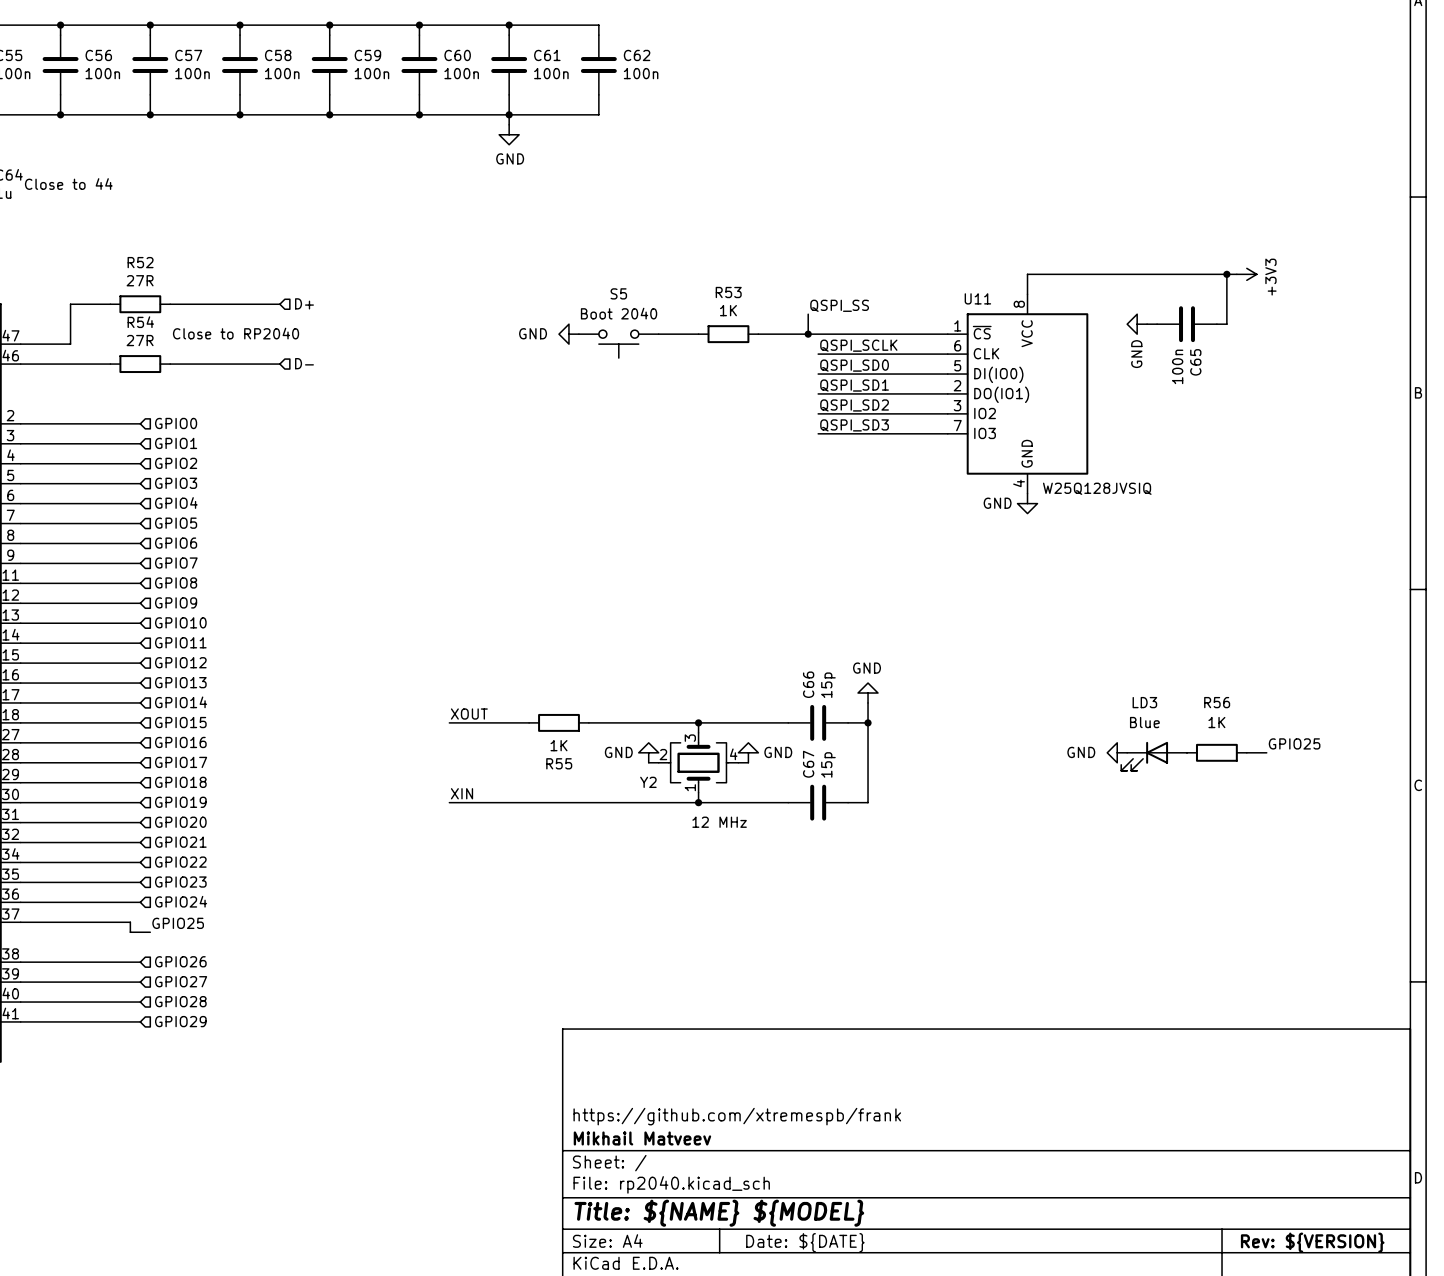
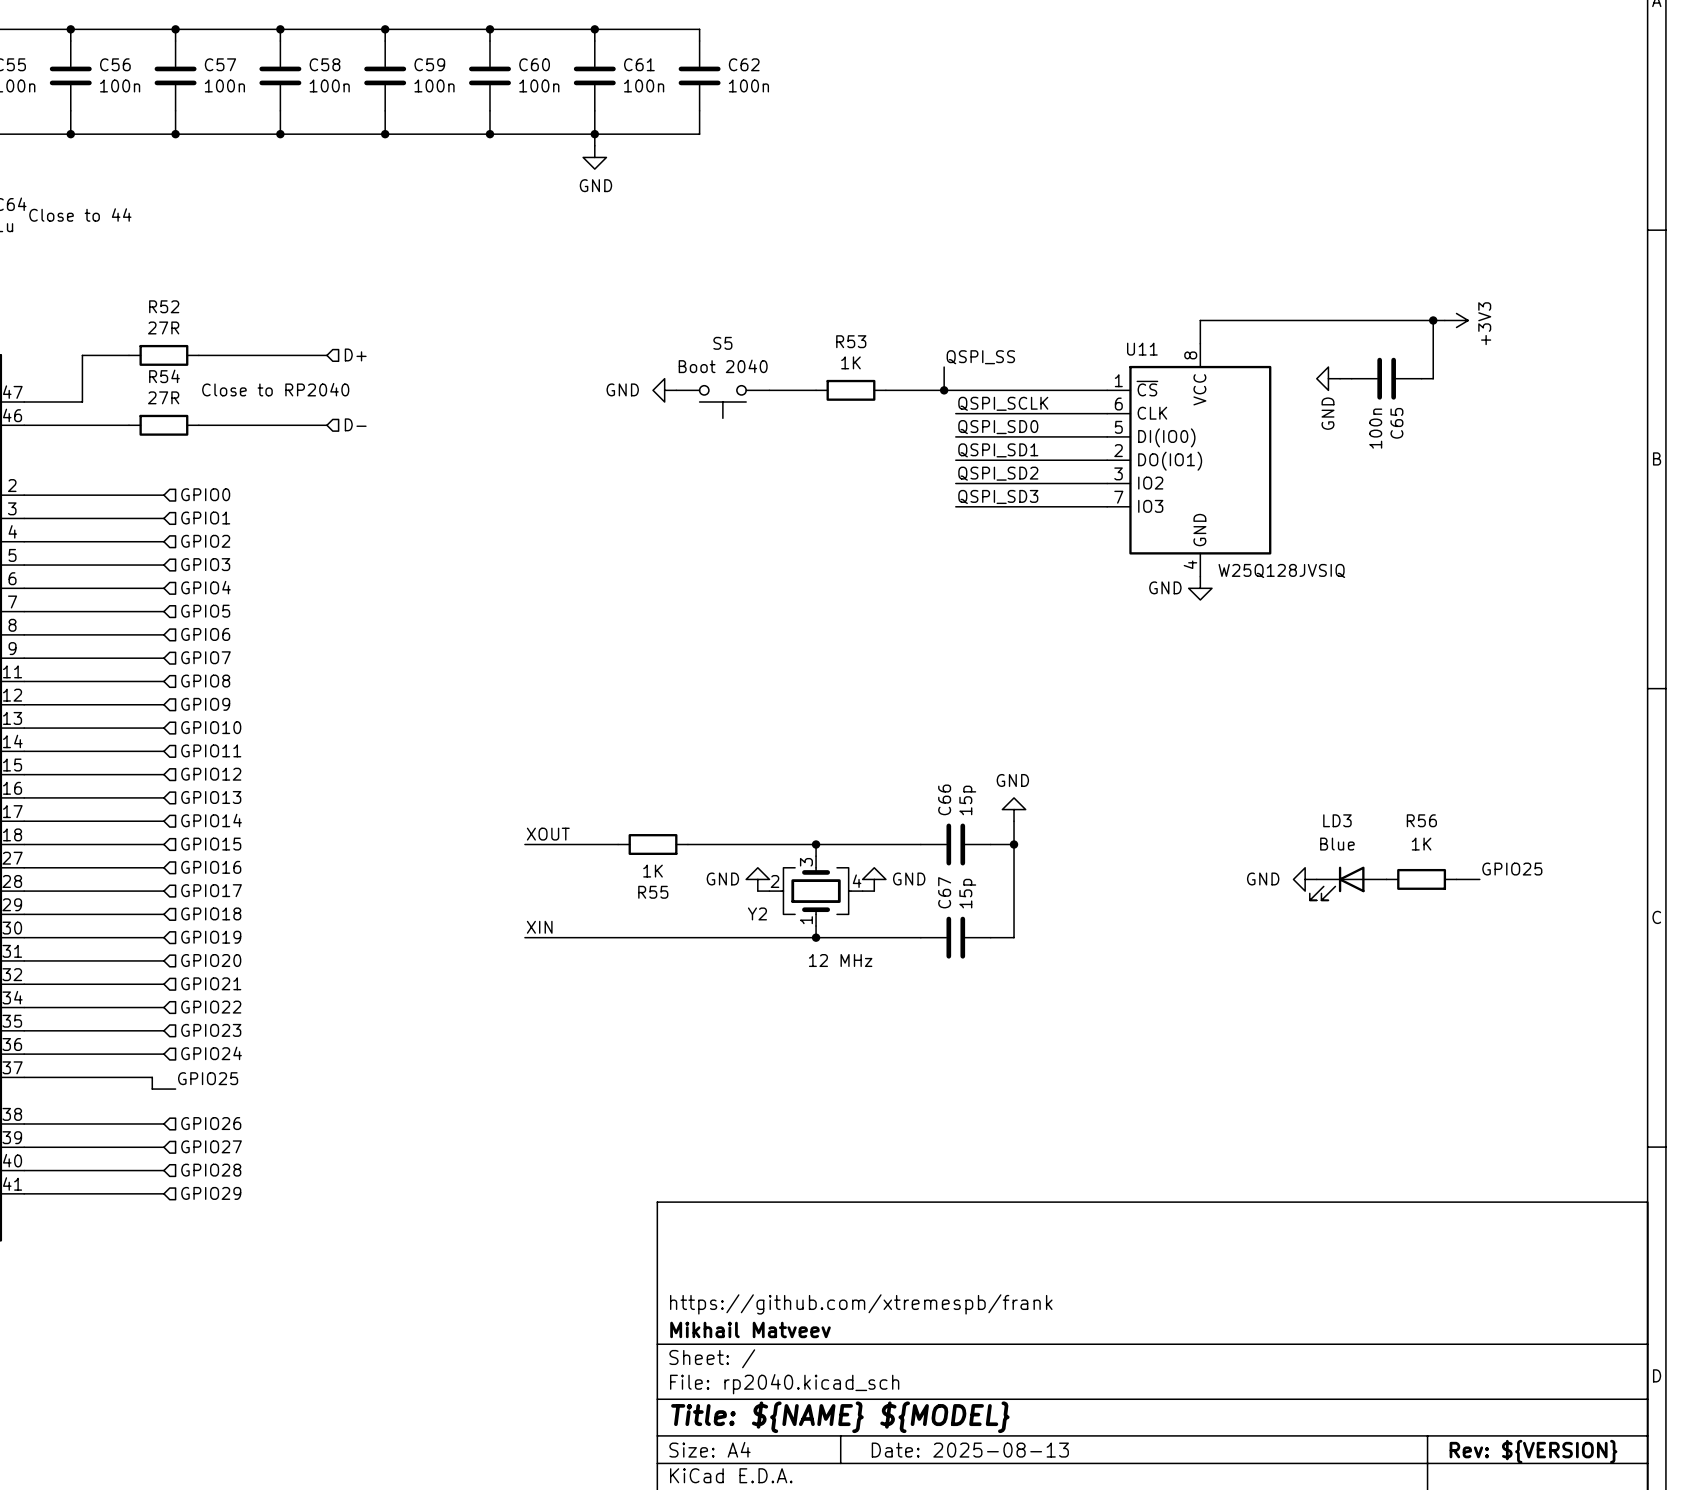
title block: Date: ${DATE} (805, 1242) -> Date: 2025-08-13 (970, 1450)

